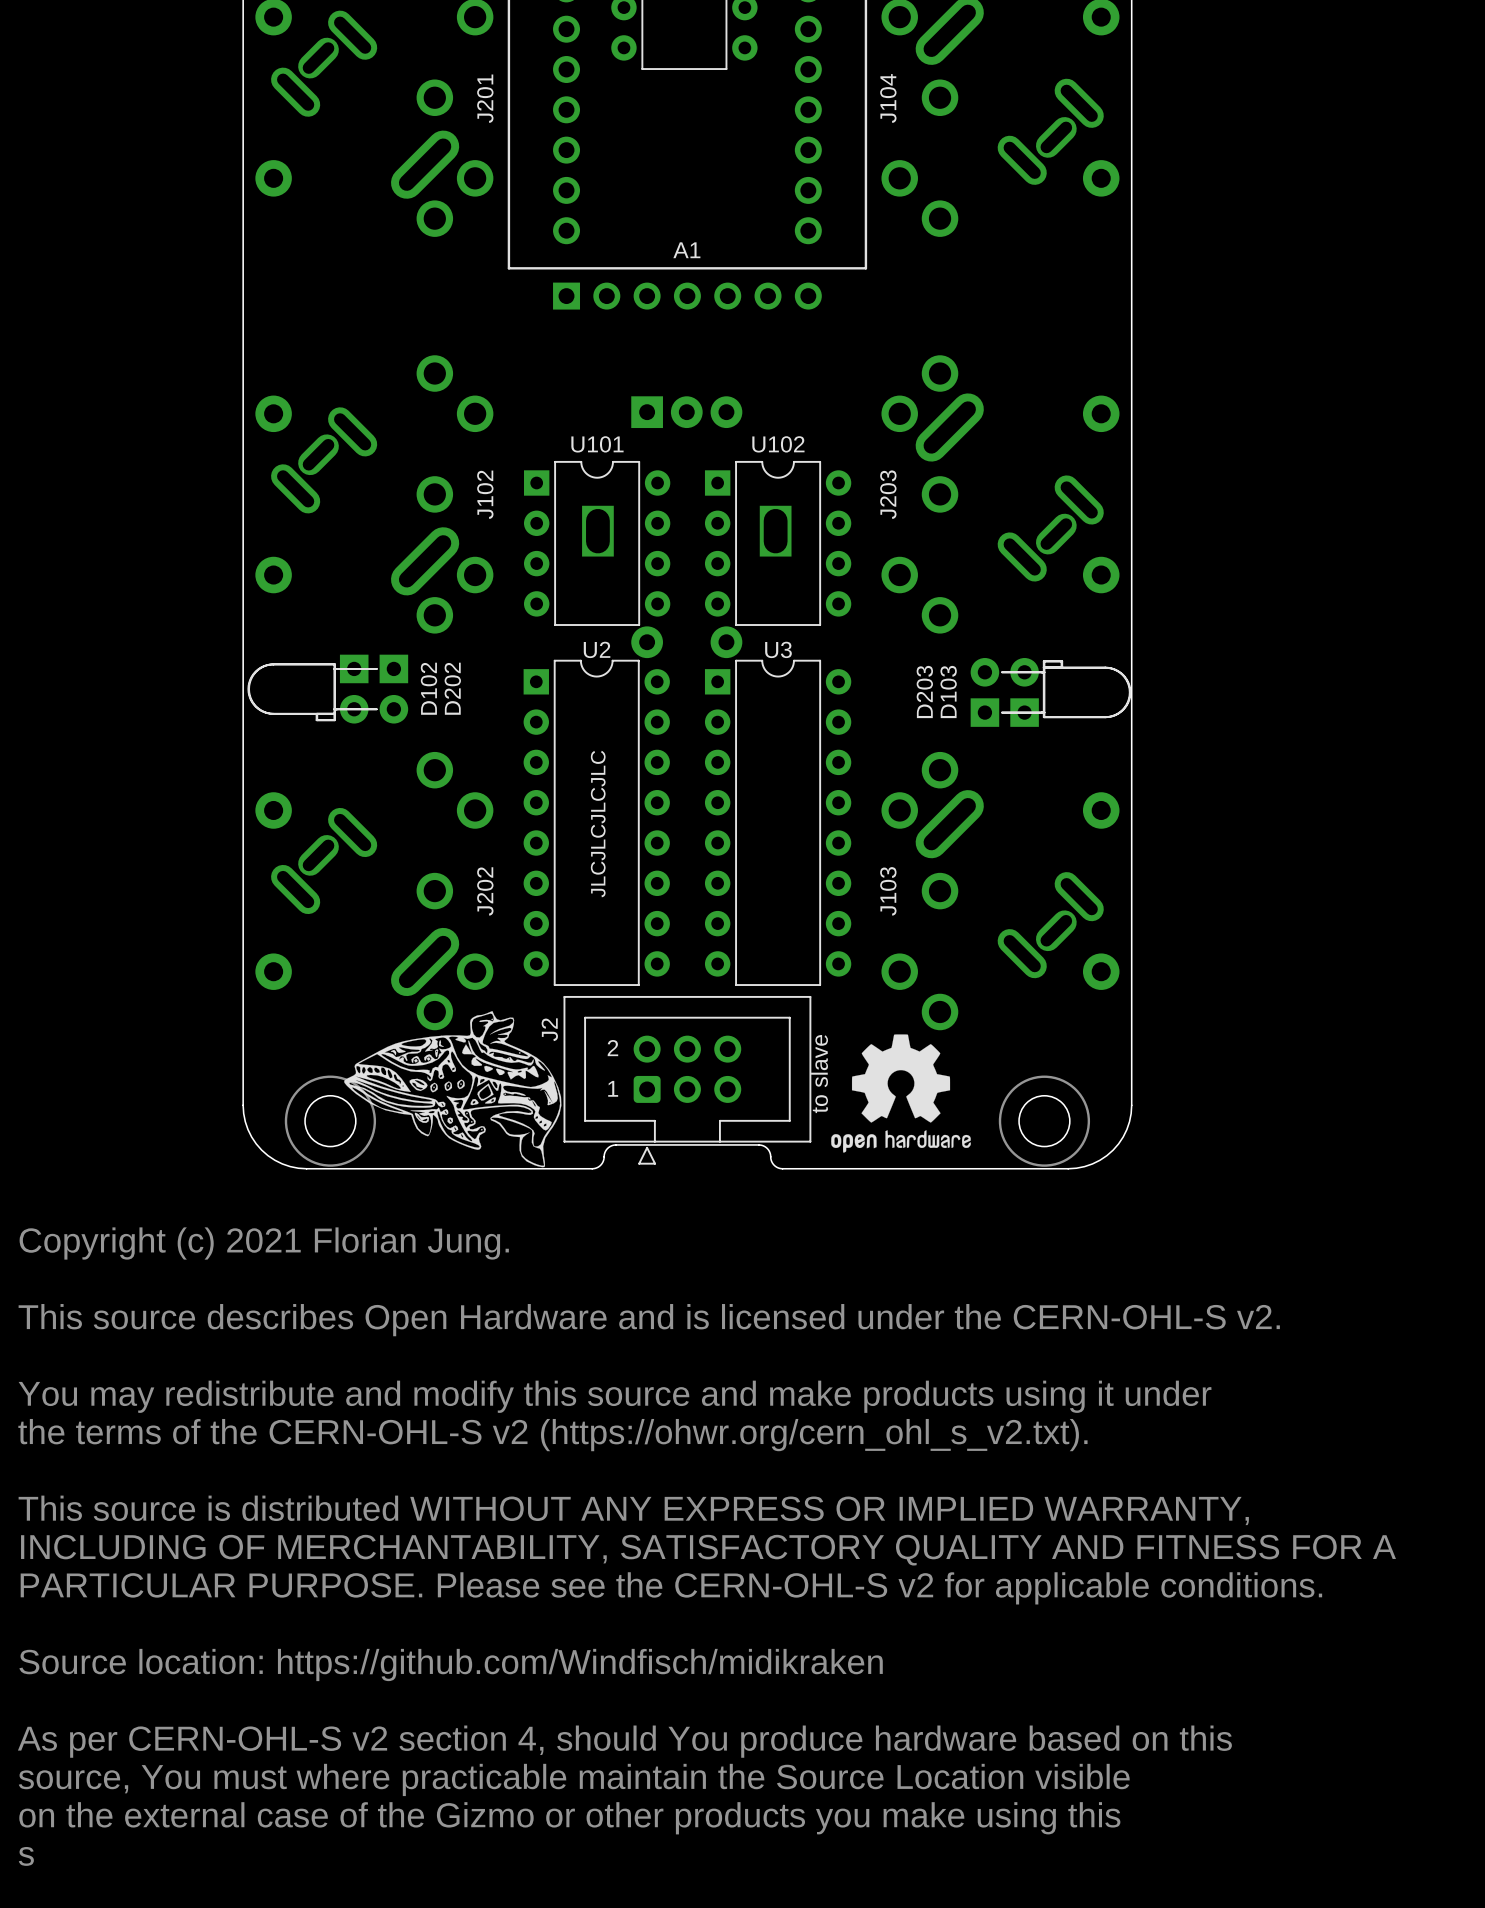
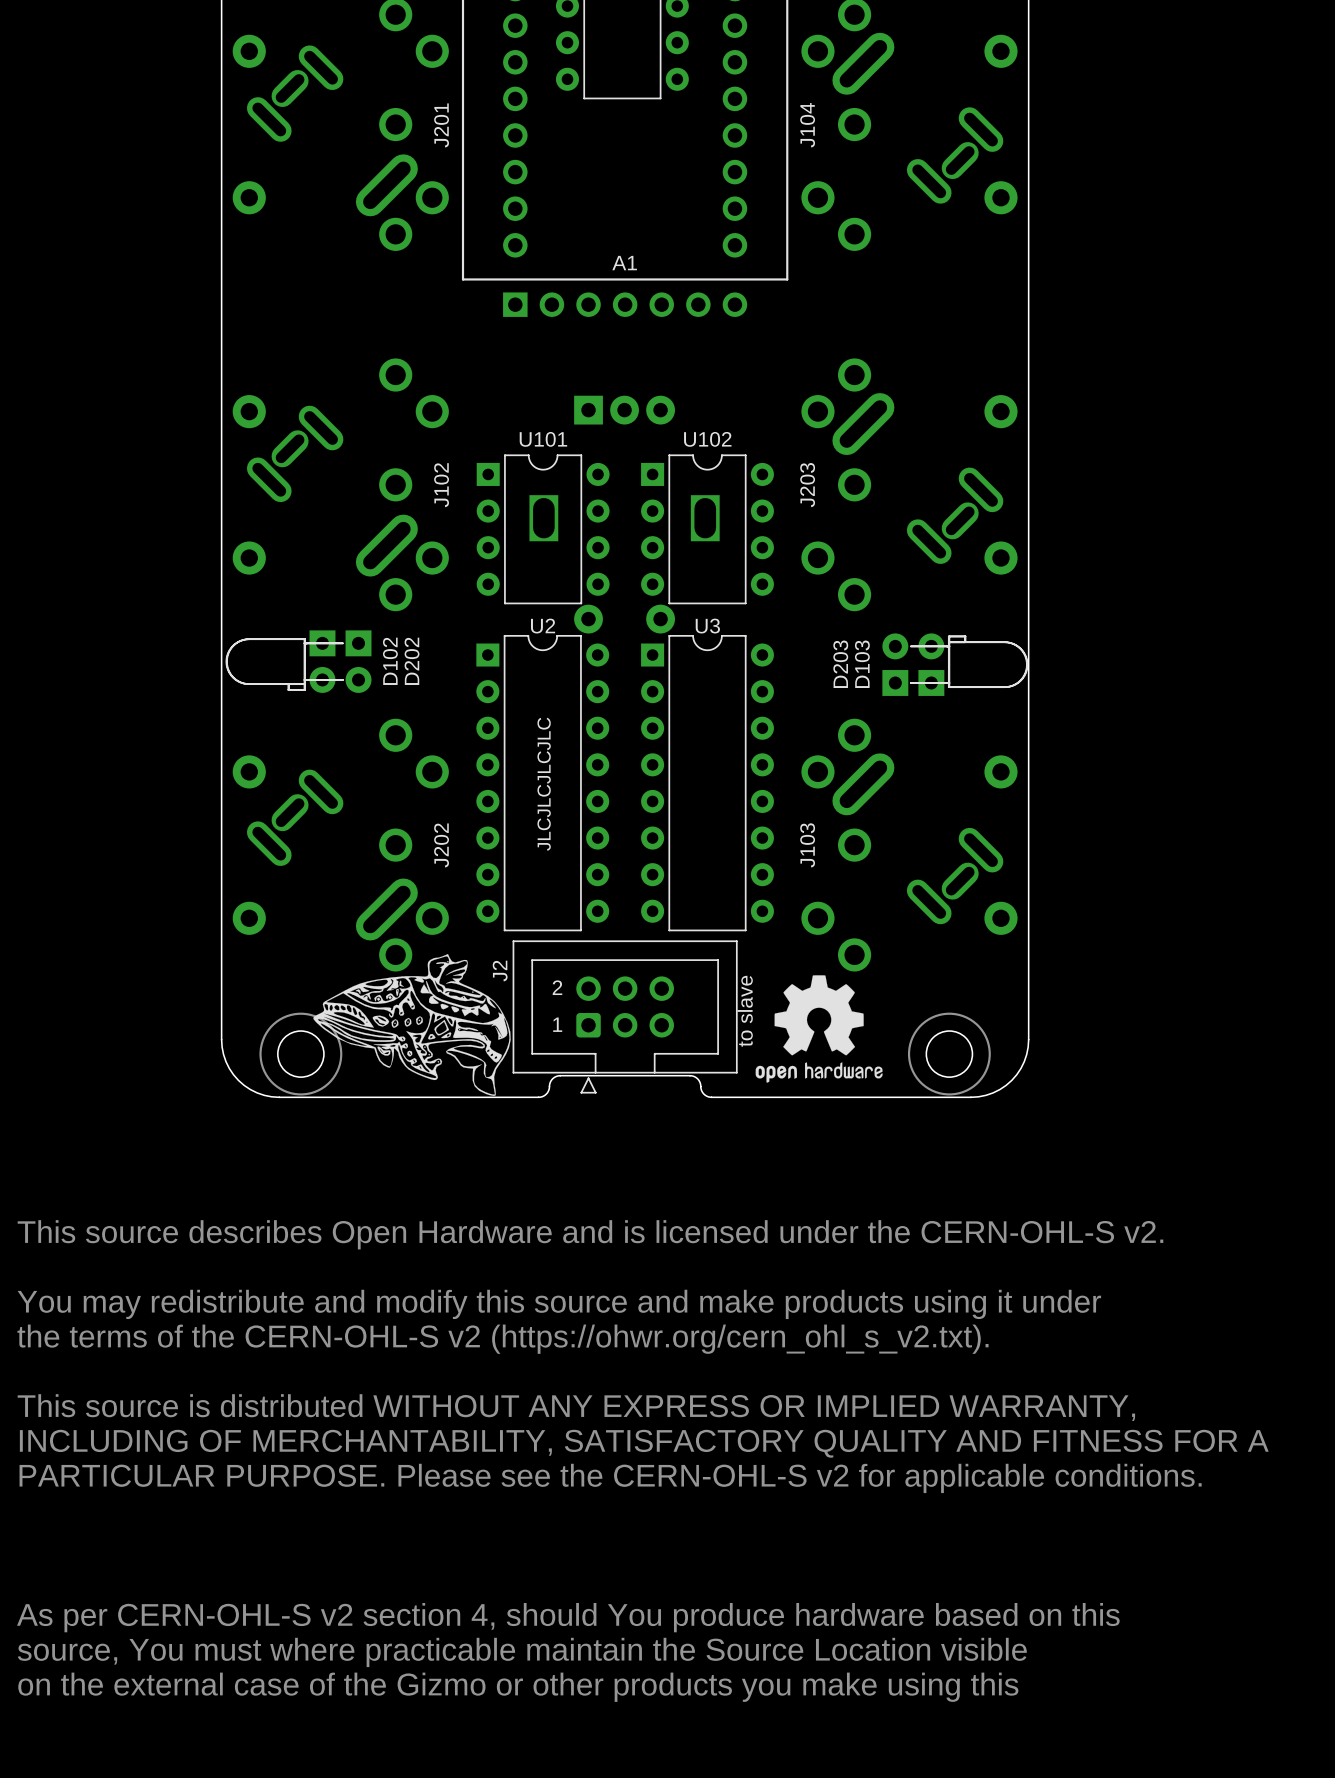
text: Copyright (c) 2021 Florian Jung. (264, 1243) -> none
text: Source location: https://github.com/Windfisch/midikraken (451, 1665) -> none
text: s (26, 1856) -> none

